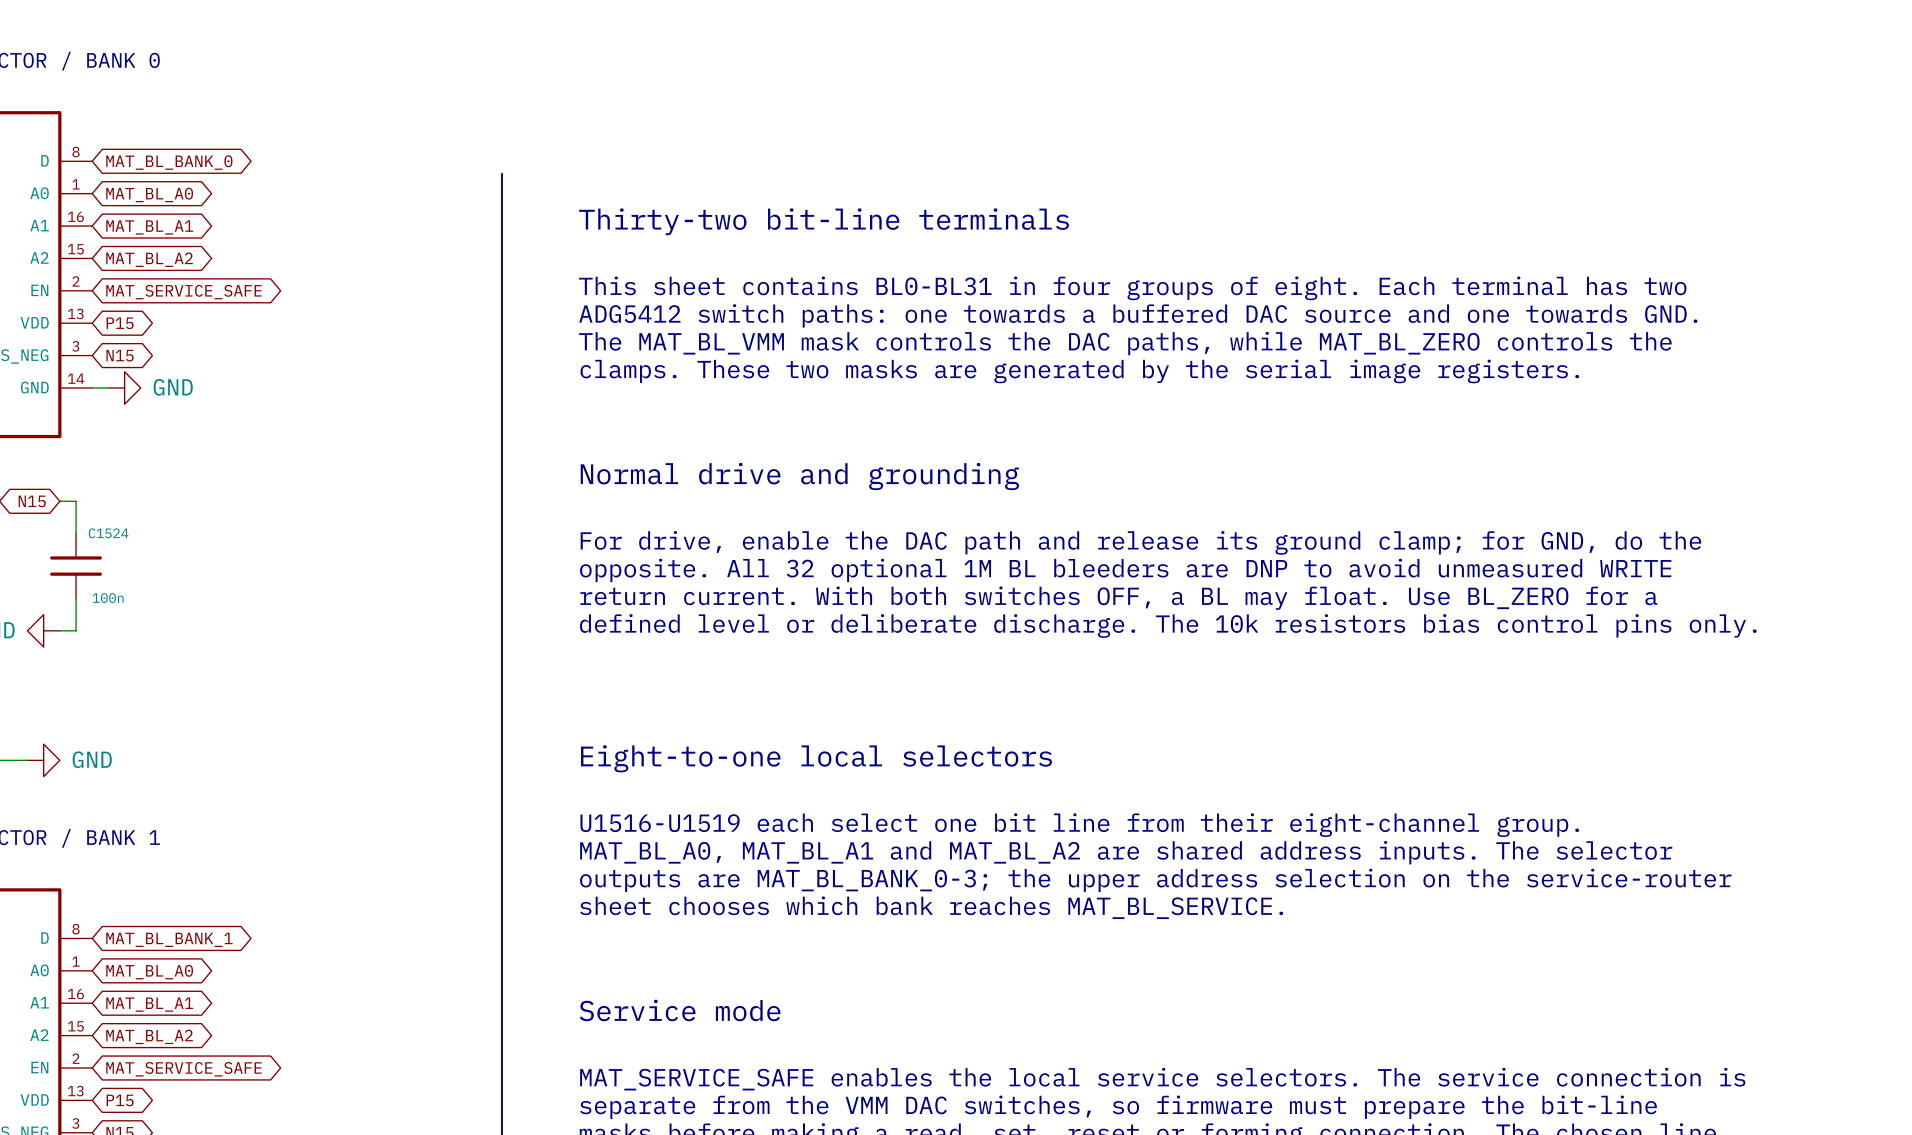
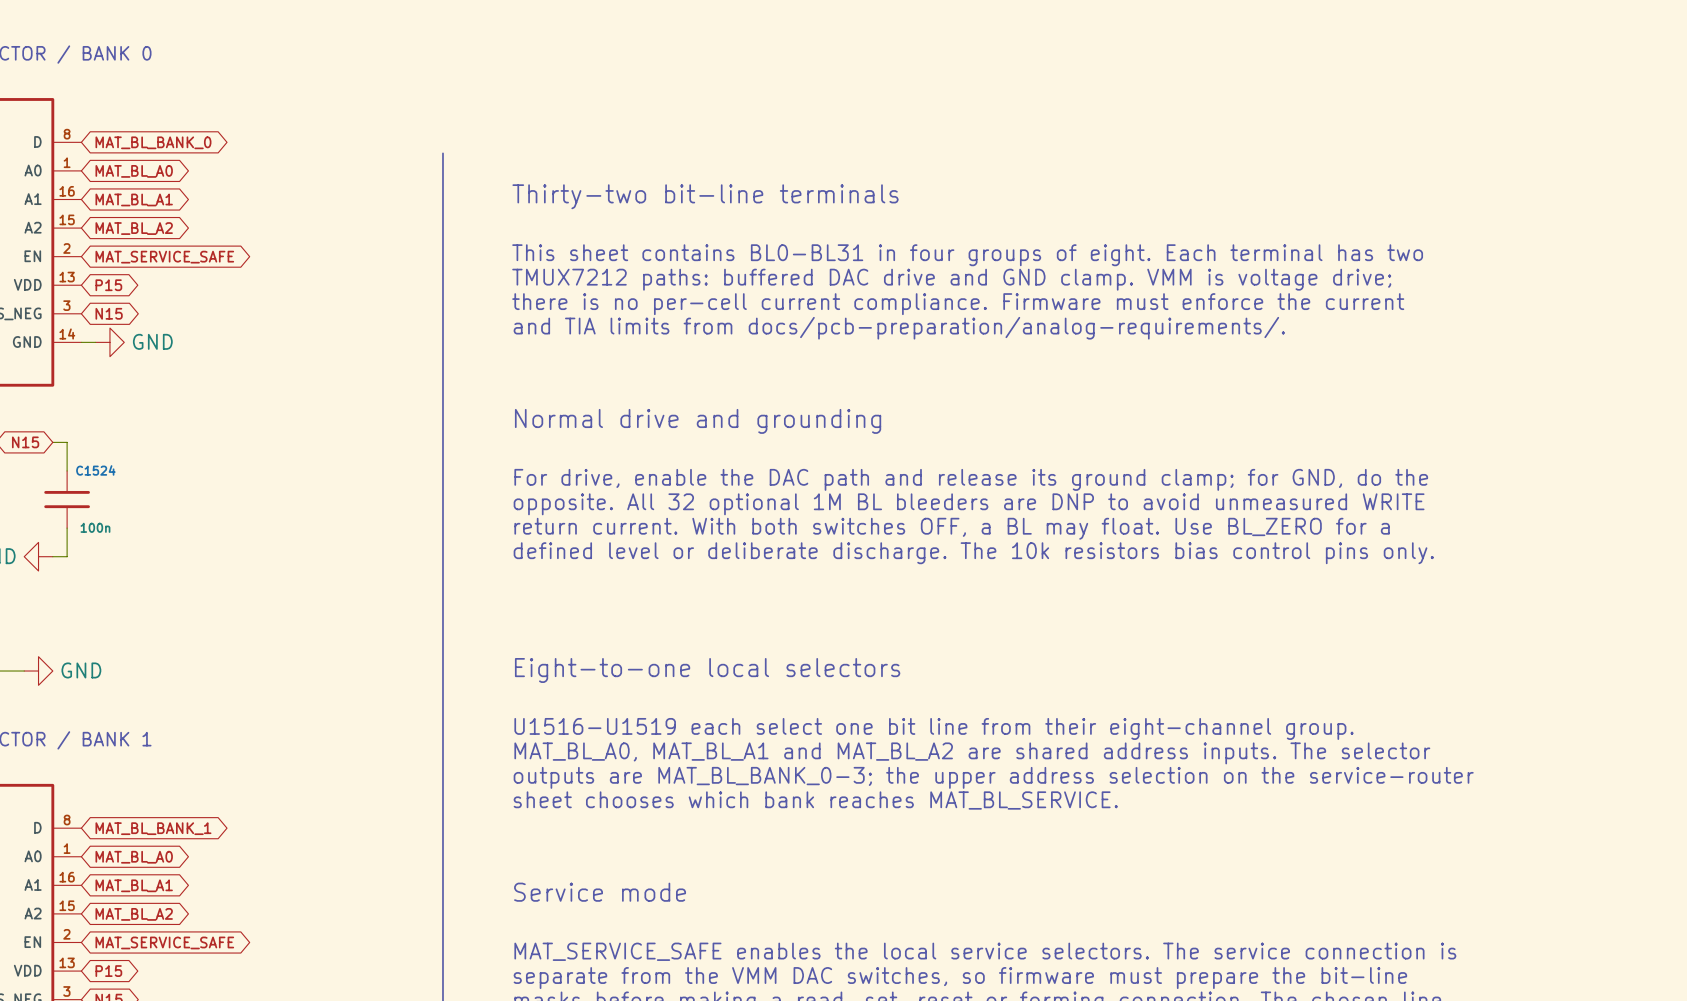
text: ADG5412 switch paths: one towards a buffered DAC source and one towards GND. (1138, 315) -> TMUX7212 paths: buffered DAC drive and GND clamp. VMM is voltage drive; (951, 279)
text: The MAT_BL_VMM mask controls the DAC paths, while MAT_BL_ZERO controls the (1125, 343) -> there is no per-cell current compliance. Firmware must enforce the current (958, 304)
text: clamps. These two masks are generated by the serial image registers. (1079, 371) -> and TIA limits from docs/pcb-preparation/analog-requirements/. (899, 328)

